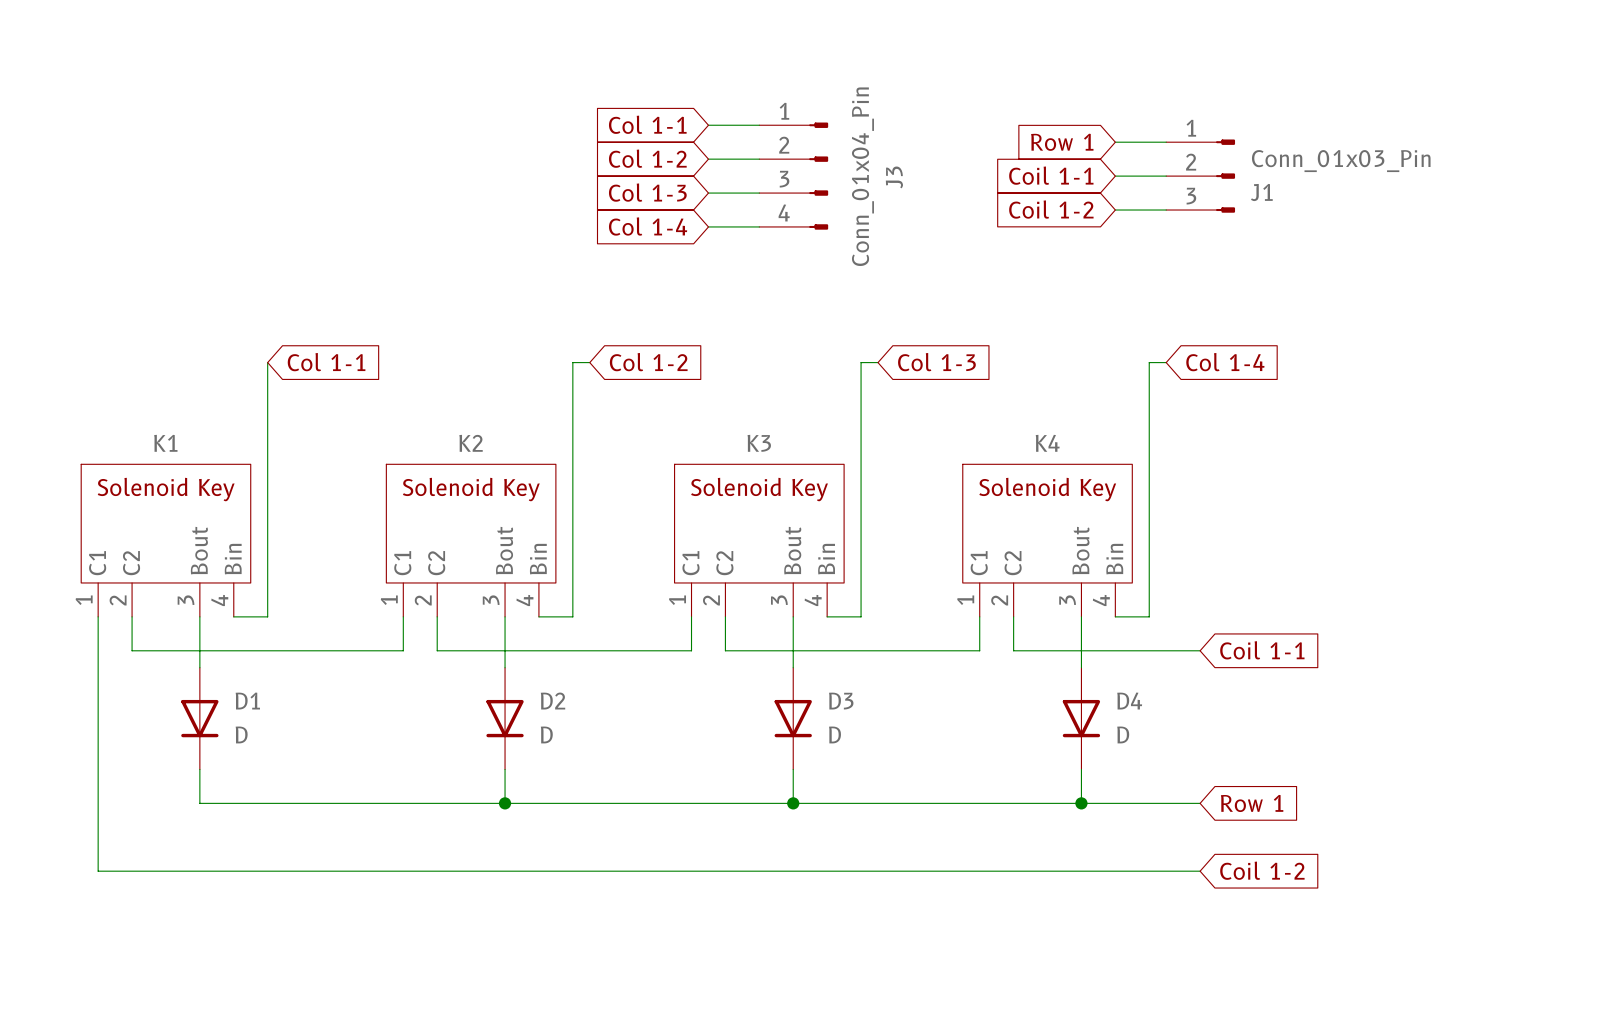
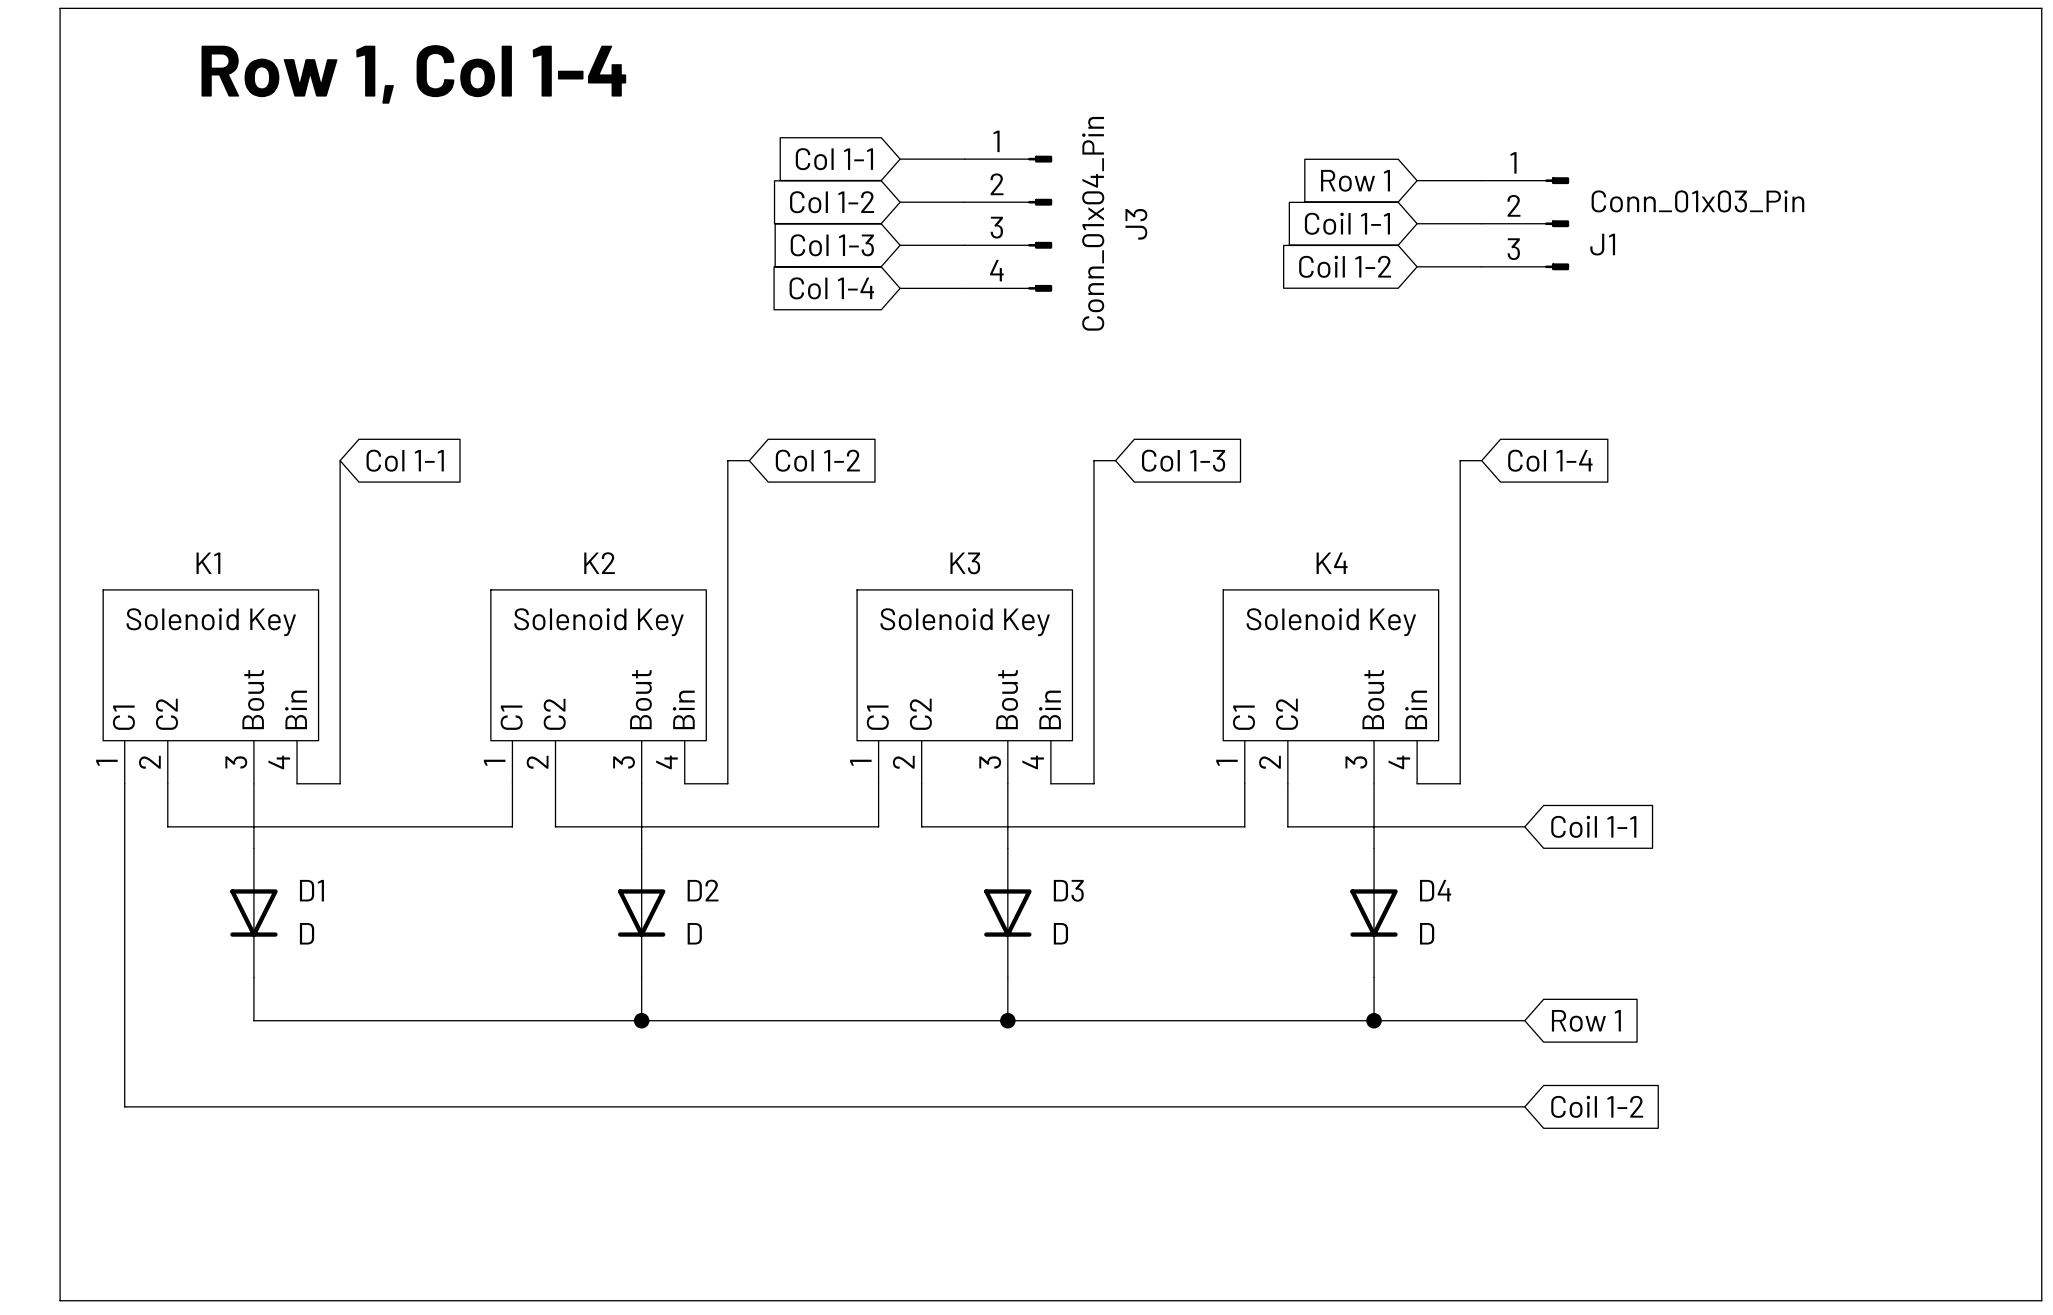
line: none -> (60, 8) (2041, 8) (2041, 1300) (60, 1300) (60, 8)
text: none -> Row 1, Col 1-4 (413, 74)

